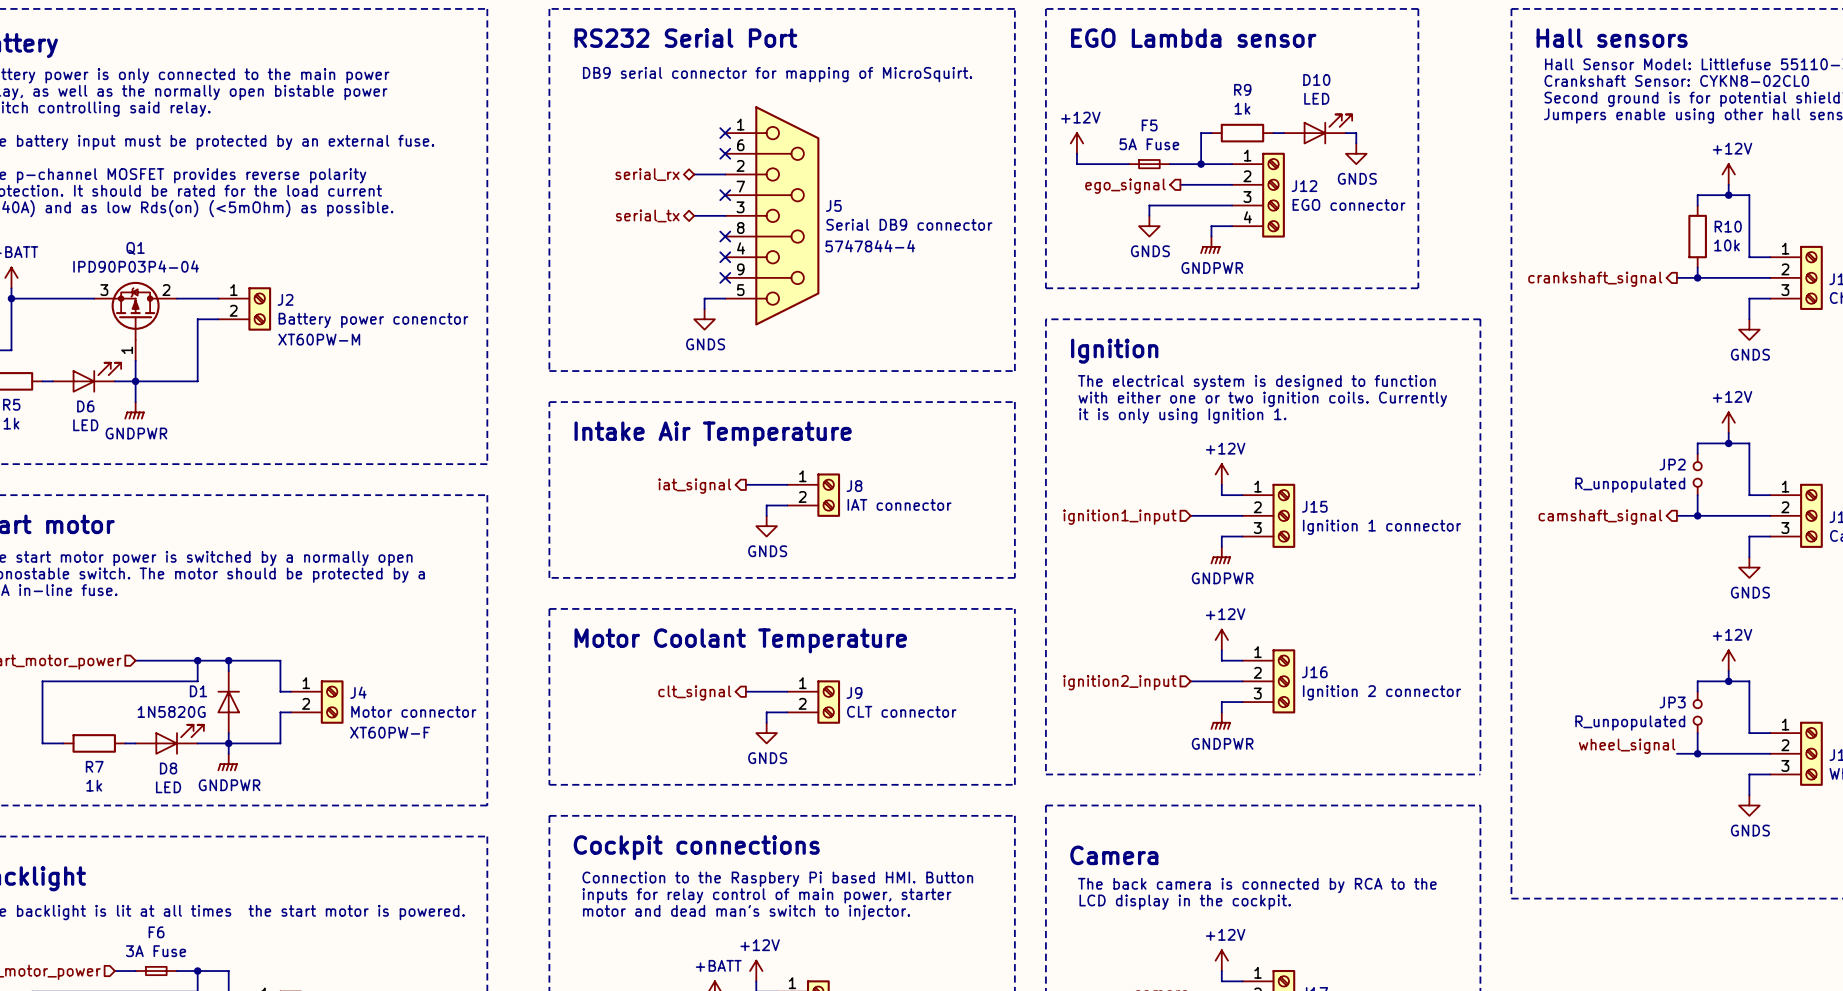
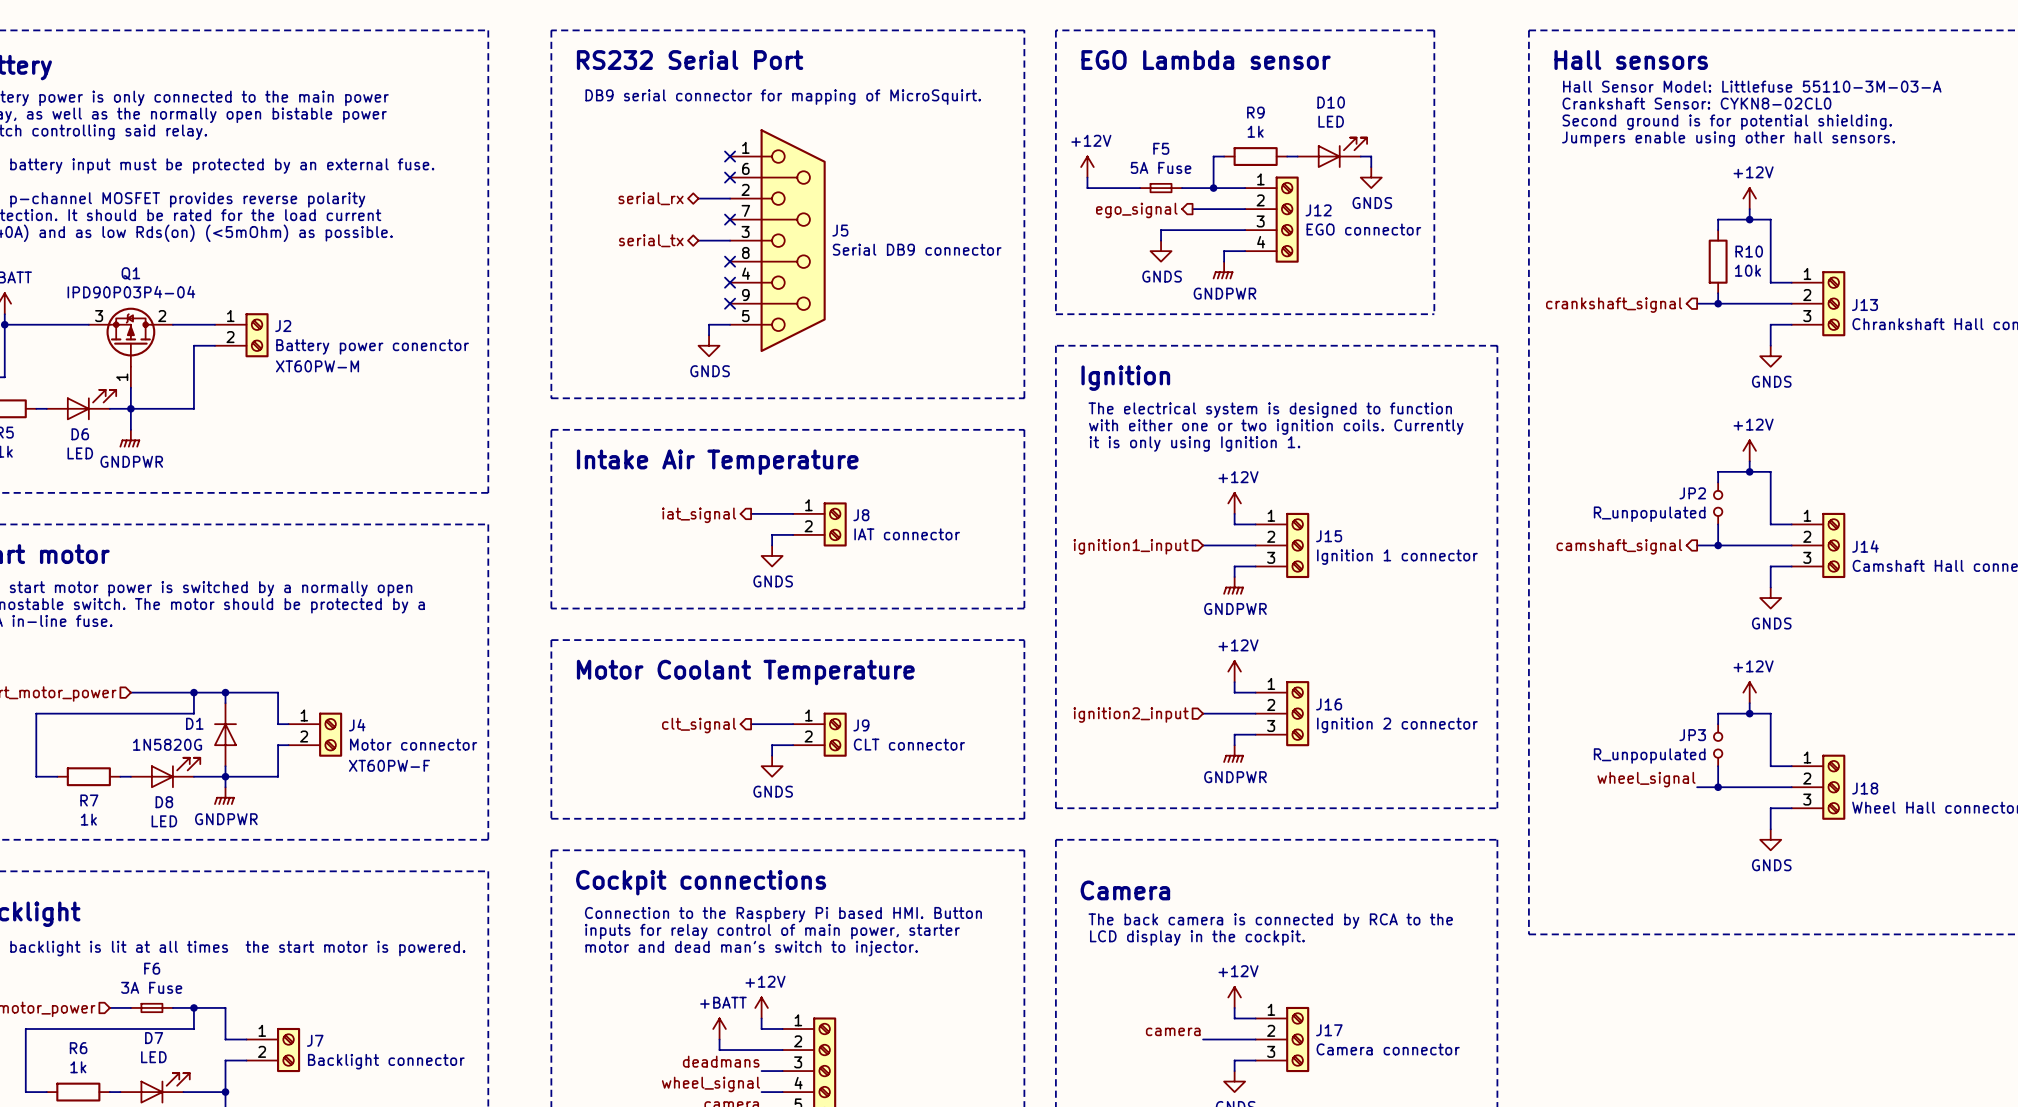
J5 text: 5747844-4 (870, 246) -> none

